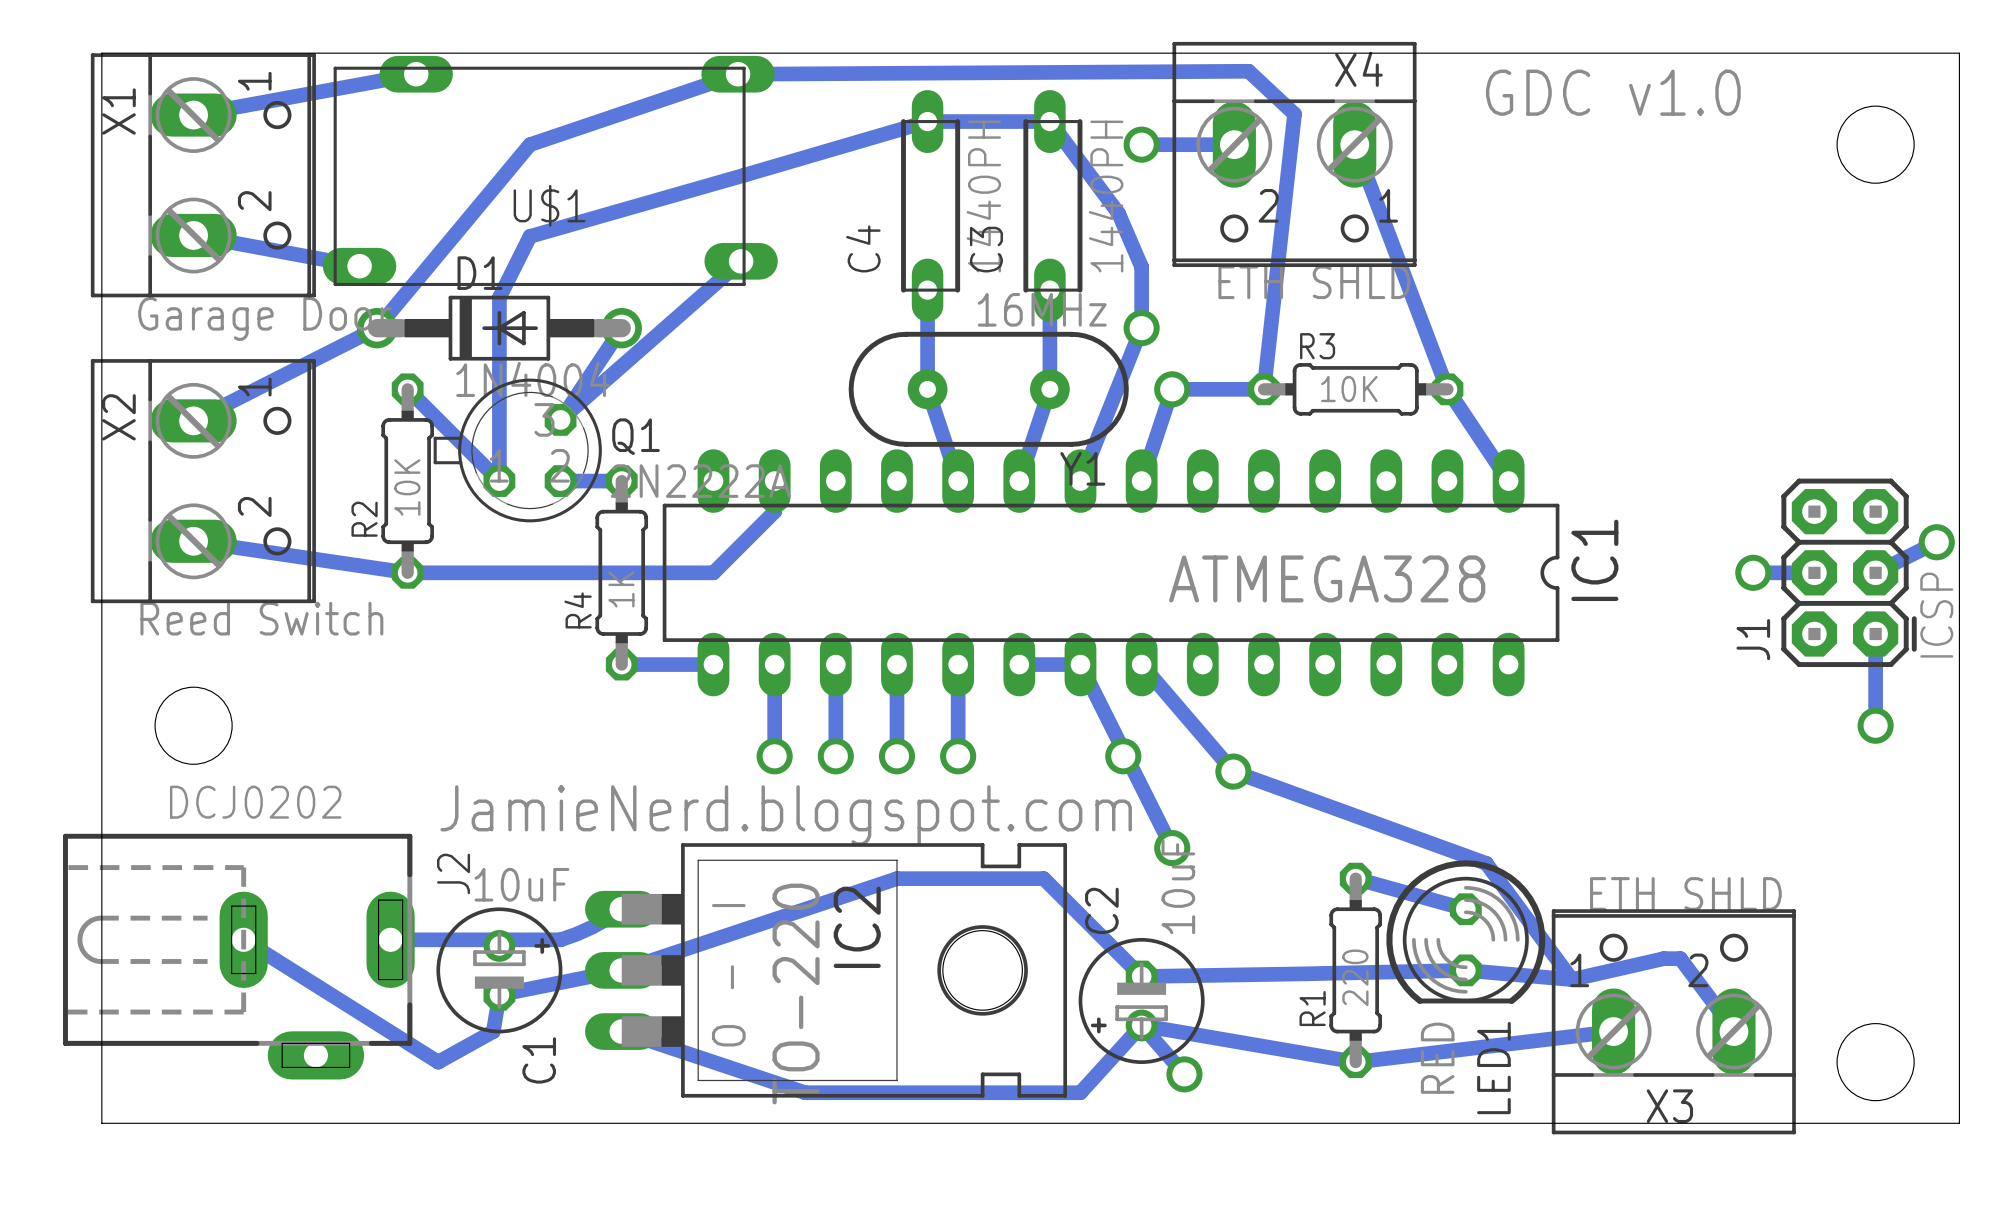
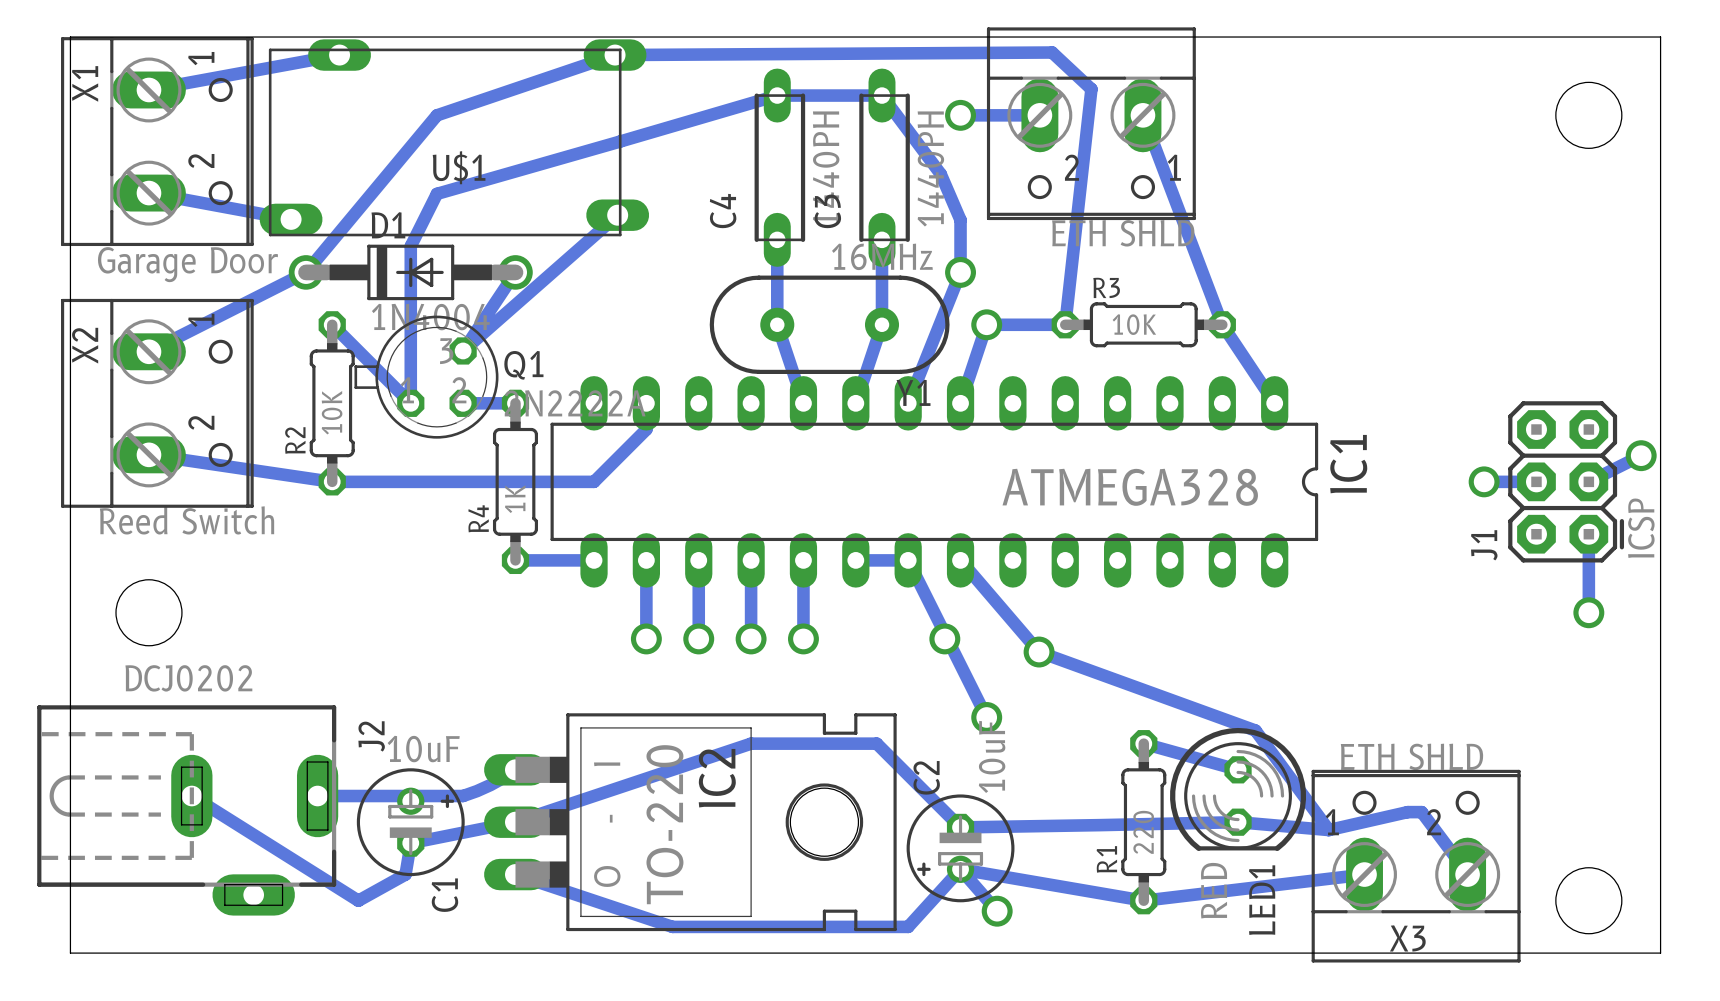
X4 name: X4 (1358, 69) -> none
text: GDC v1.0 (1613, 92) -> none
text: JamieNerd.blogspot.com (786, 815) -> none

